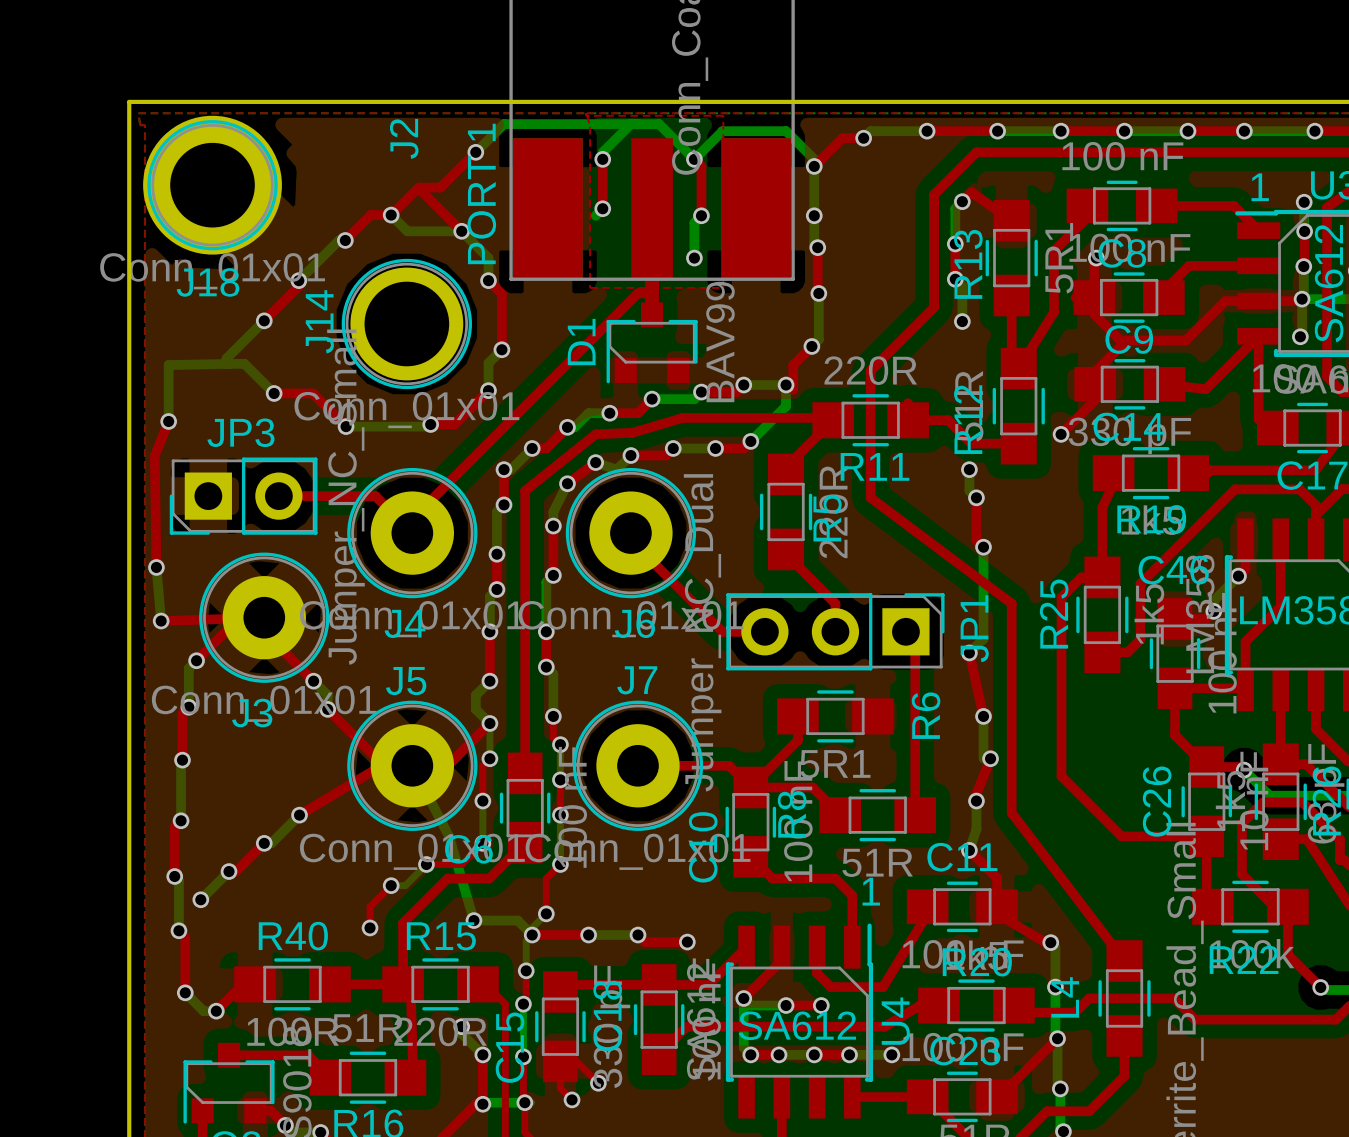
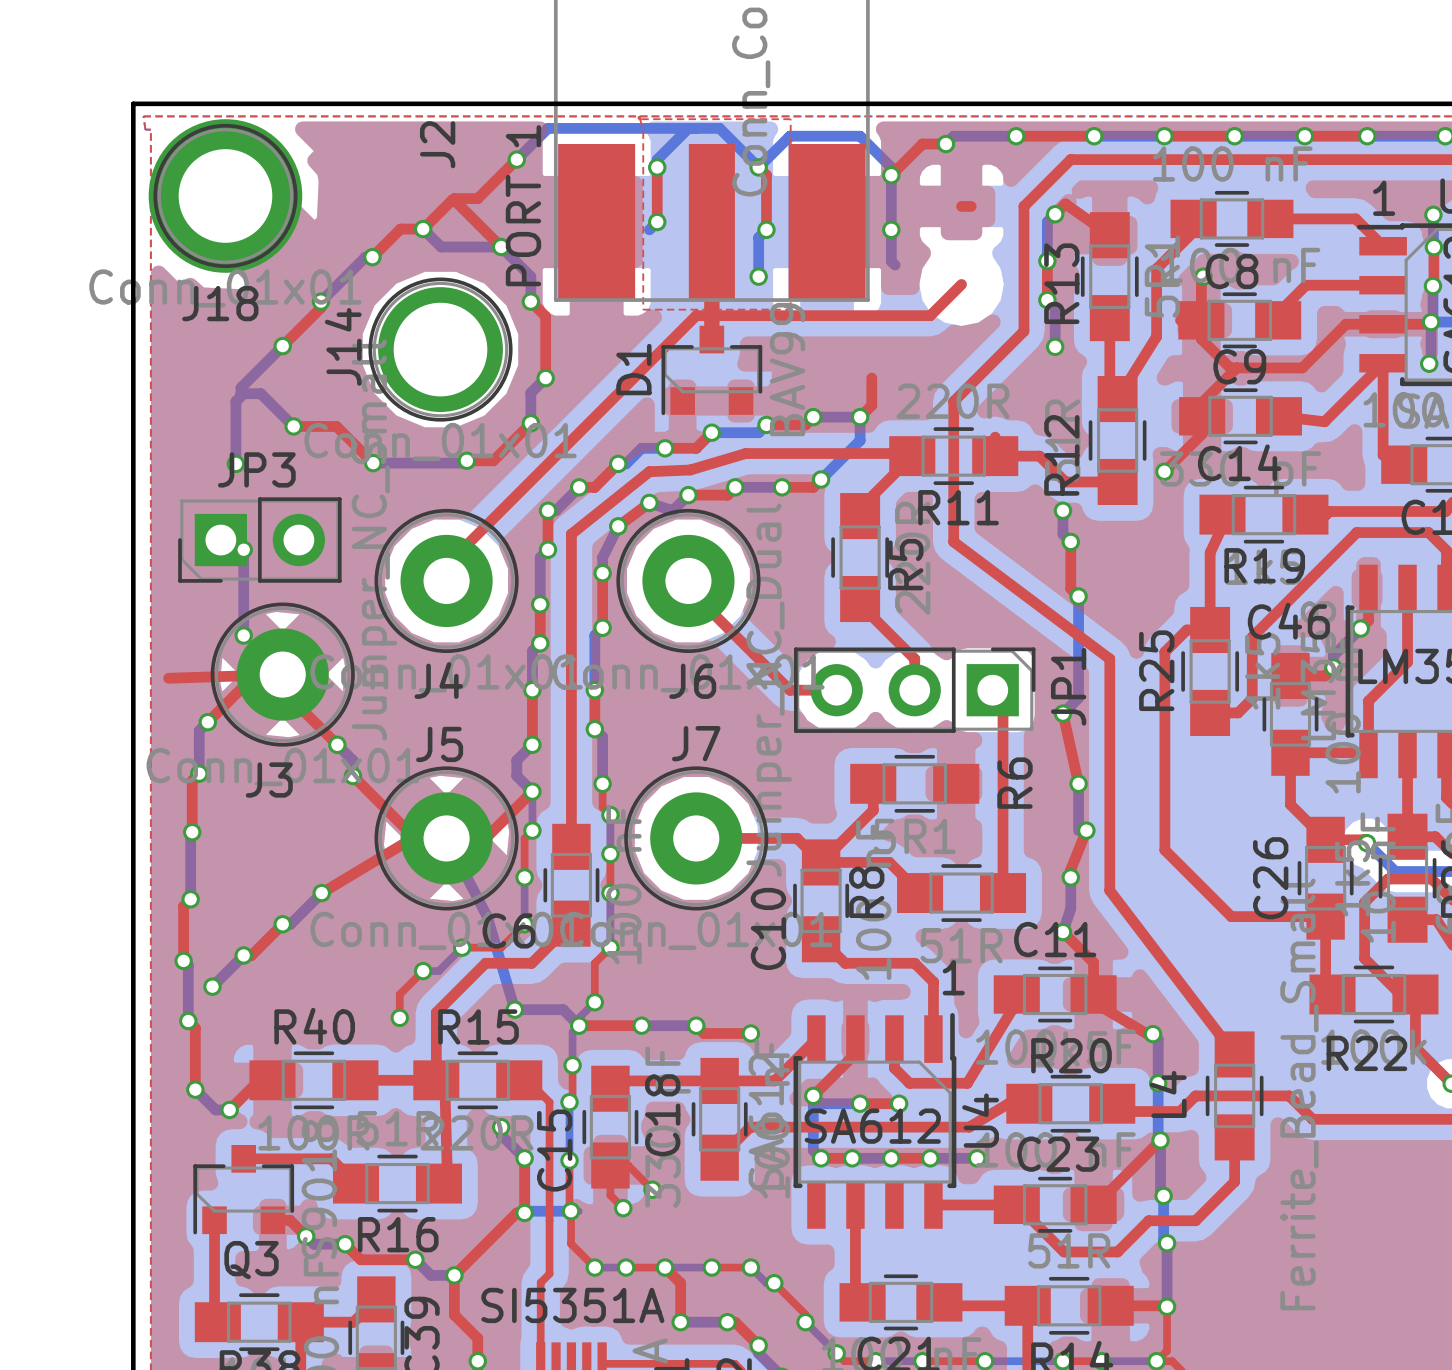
top track: none -> (961, 206) (971, 206)
top track: (817, 247) (818, 293) -> none
via: (817, 247) -> none
top track: none -> (961, 284) (930, 315) (711, 315)
bottom track: (818, 293) (818, 339) (811, 346) -> none
via: (818, 293) -> none
top track: (811, 346) (793, 365) (793, 389) -> none
via: (811, 346) -> none
top track: none -> (871, 378) (871, 405) (860, 417)
bottom track: (229, 363) (168, 365) (168, 421) -> (243, 393) (235, 401) (235, 463)
top track: (168, 421) (154, 455) (156, 567) -> none
via: (168, 421) -> none
via: none -> (235, 463)
top track: (278, 496) (375, 496) (412, 533) -> none
bottom track: none -> (243, 549) (243, 635)
via: none -> (243, 549)
bottom track: (156, 567) (161, 621) -> none
via: (156, 567) -> none
via: none -> (243, 635)
via: (161, 621) -> none

